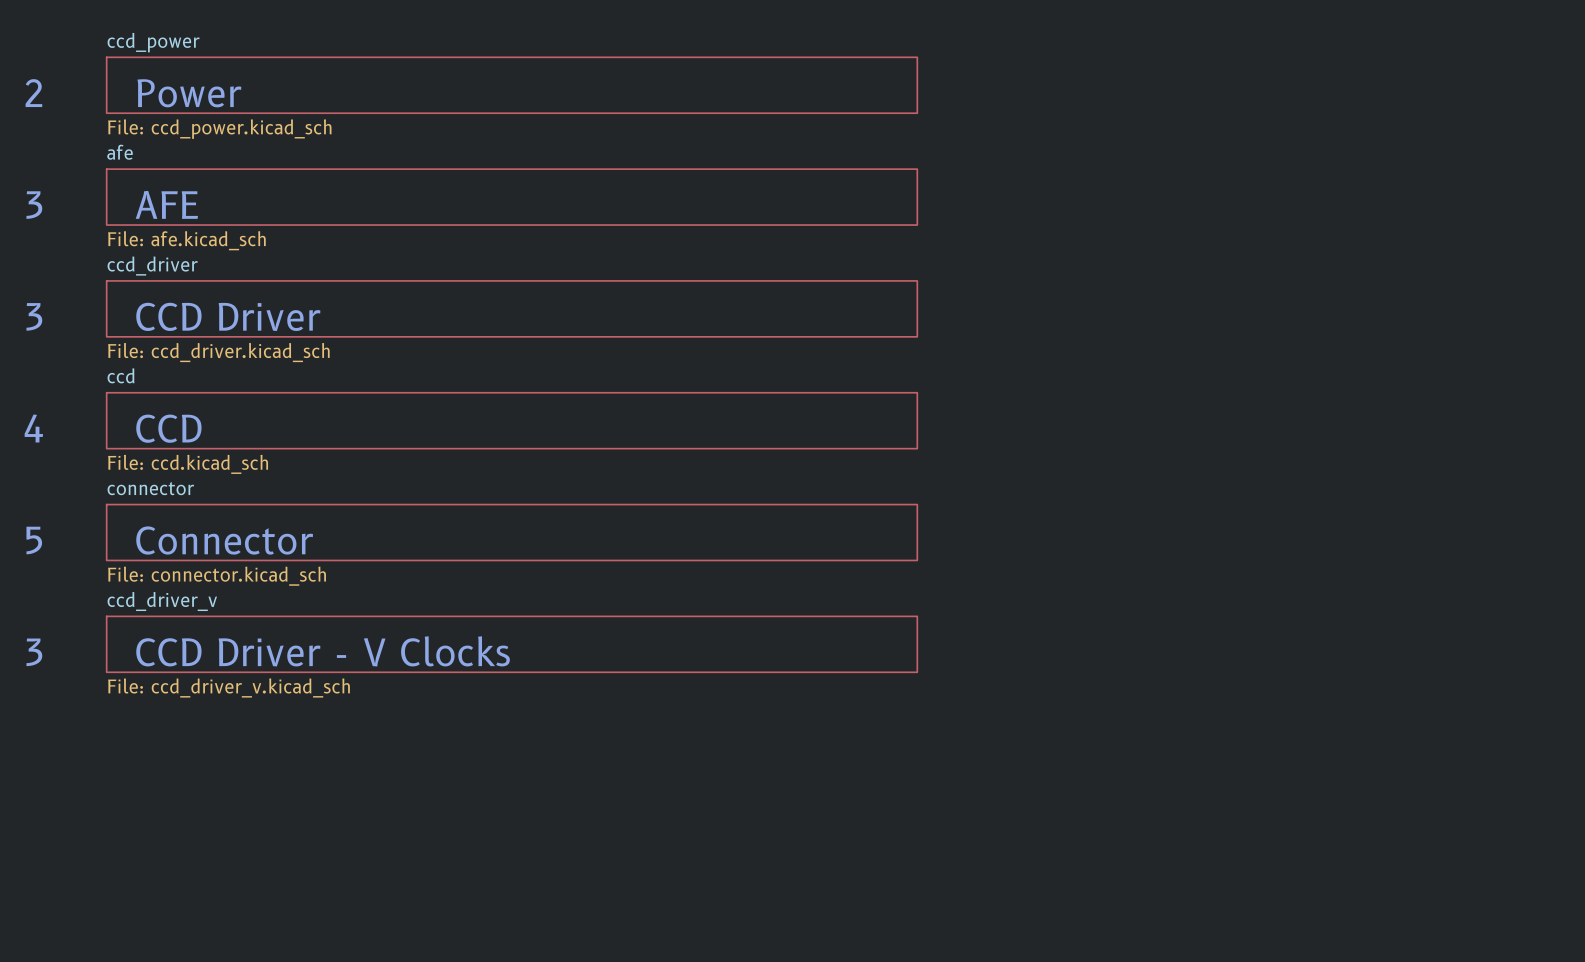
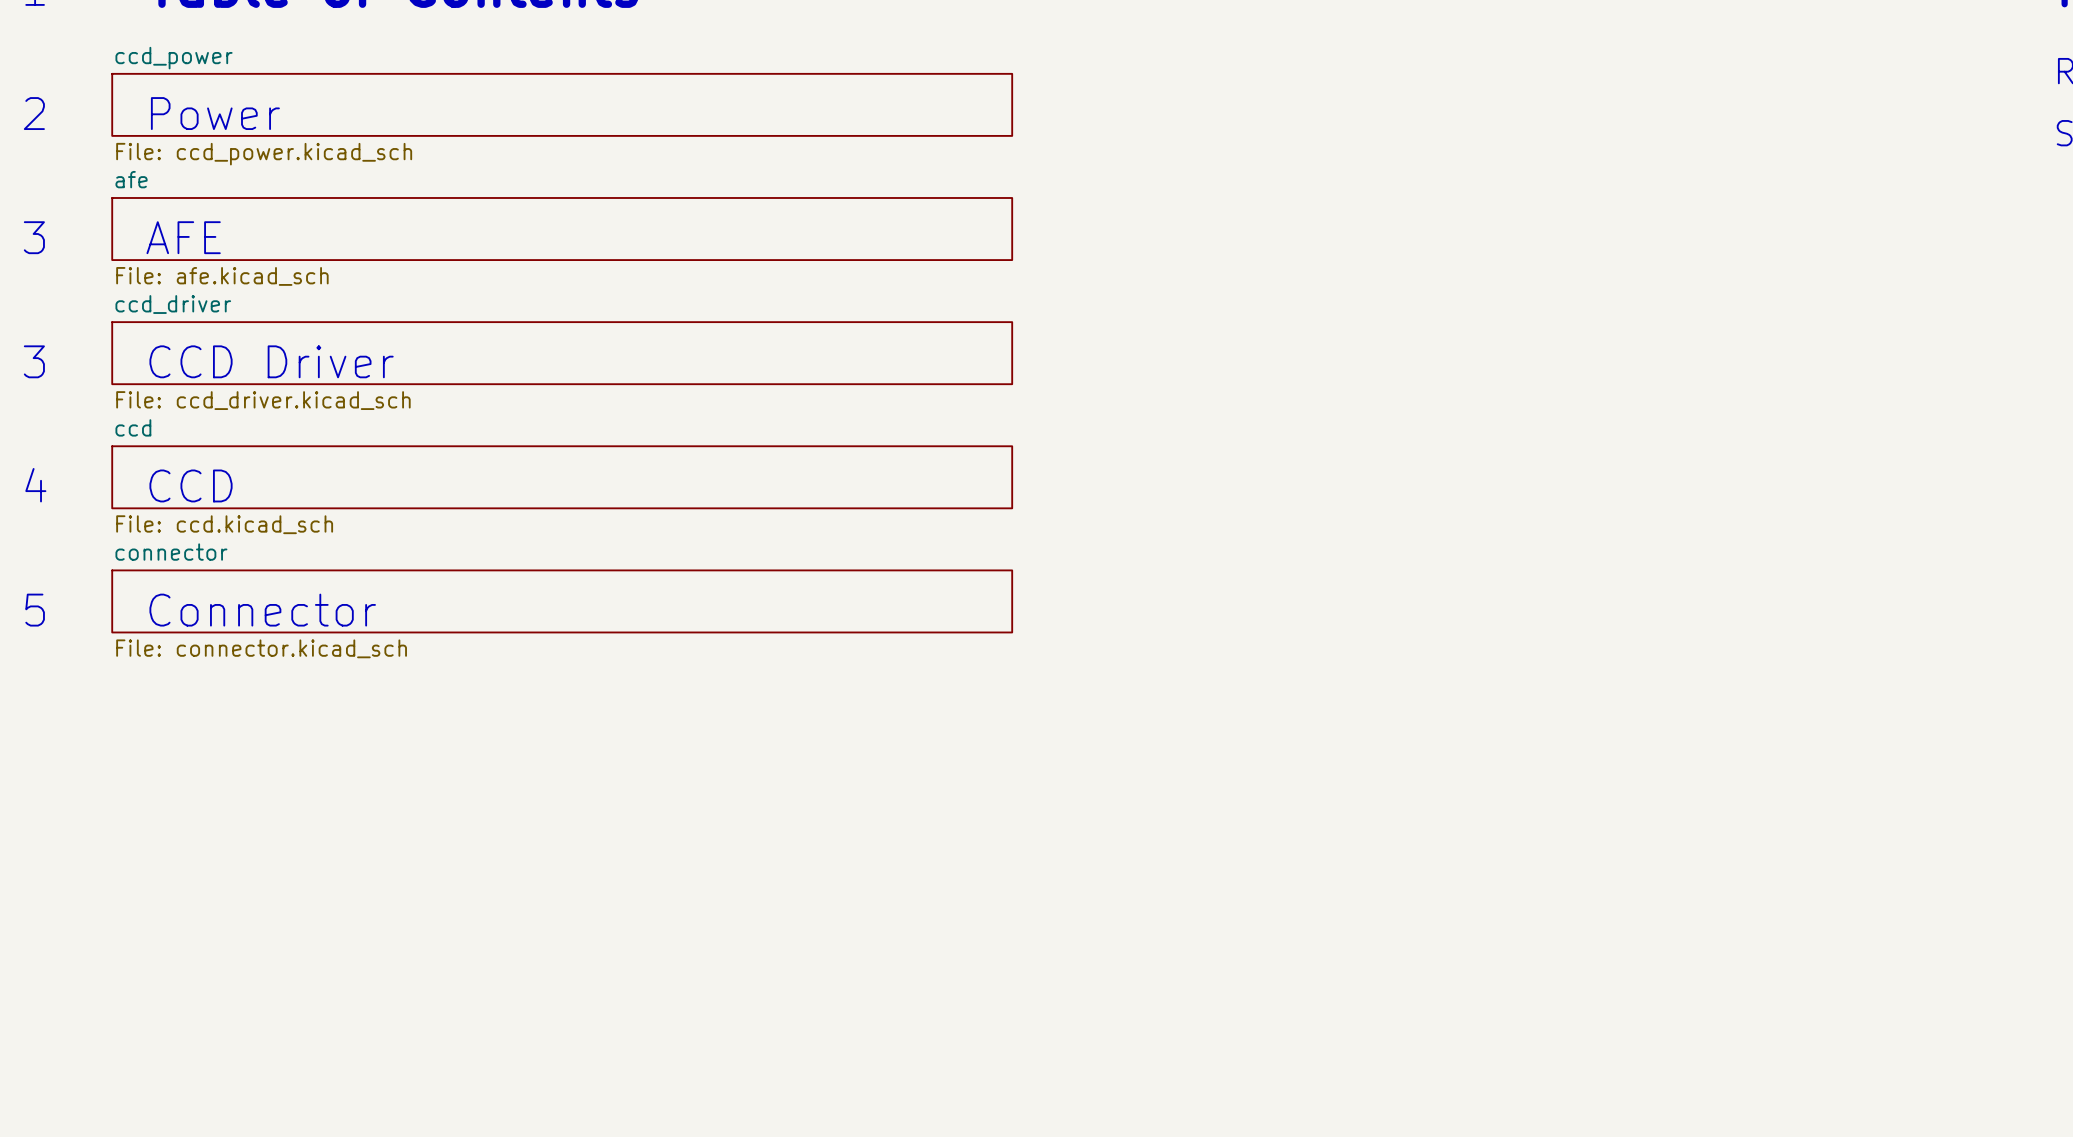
sheet ccd_driver_v: File: ccd_driver_v.kicad_sch (511, 644) -> none
text: CCD Driver - V Clocks (323, 651) -> none
text: 3 (34, 652) -> none

